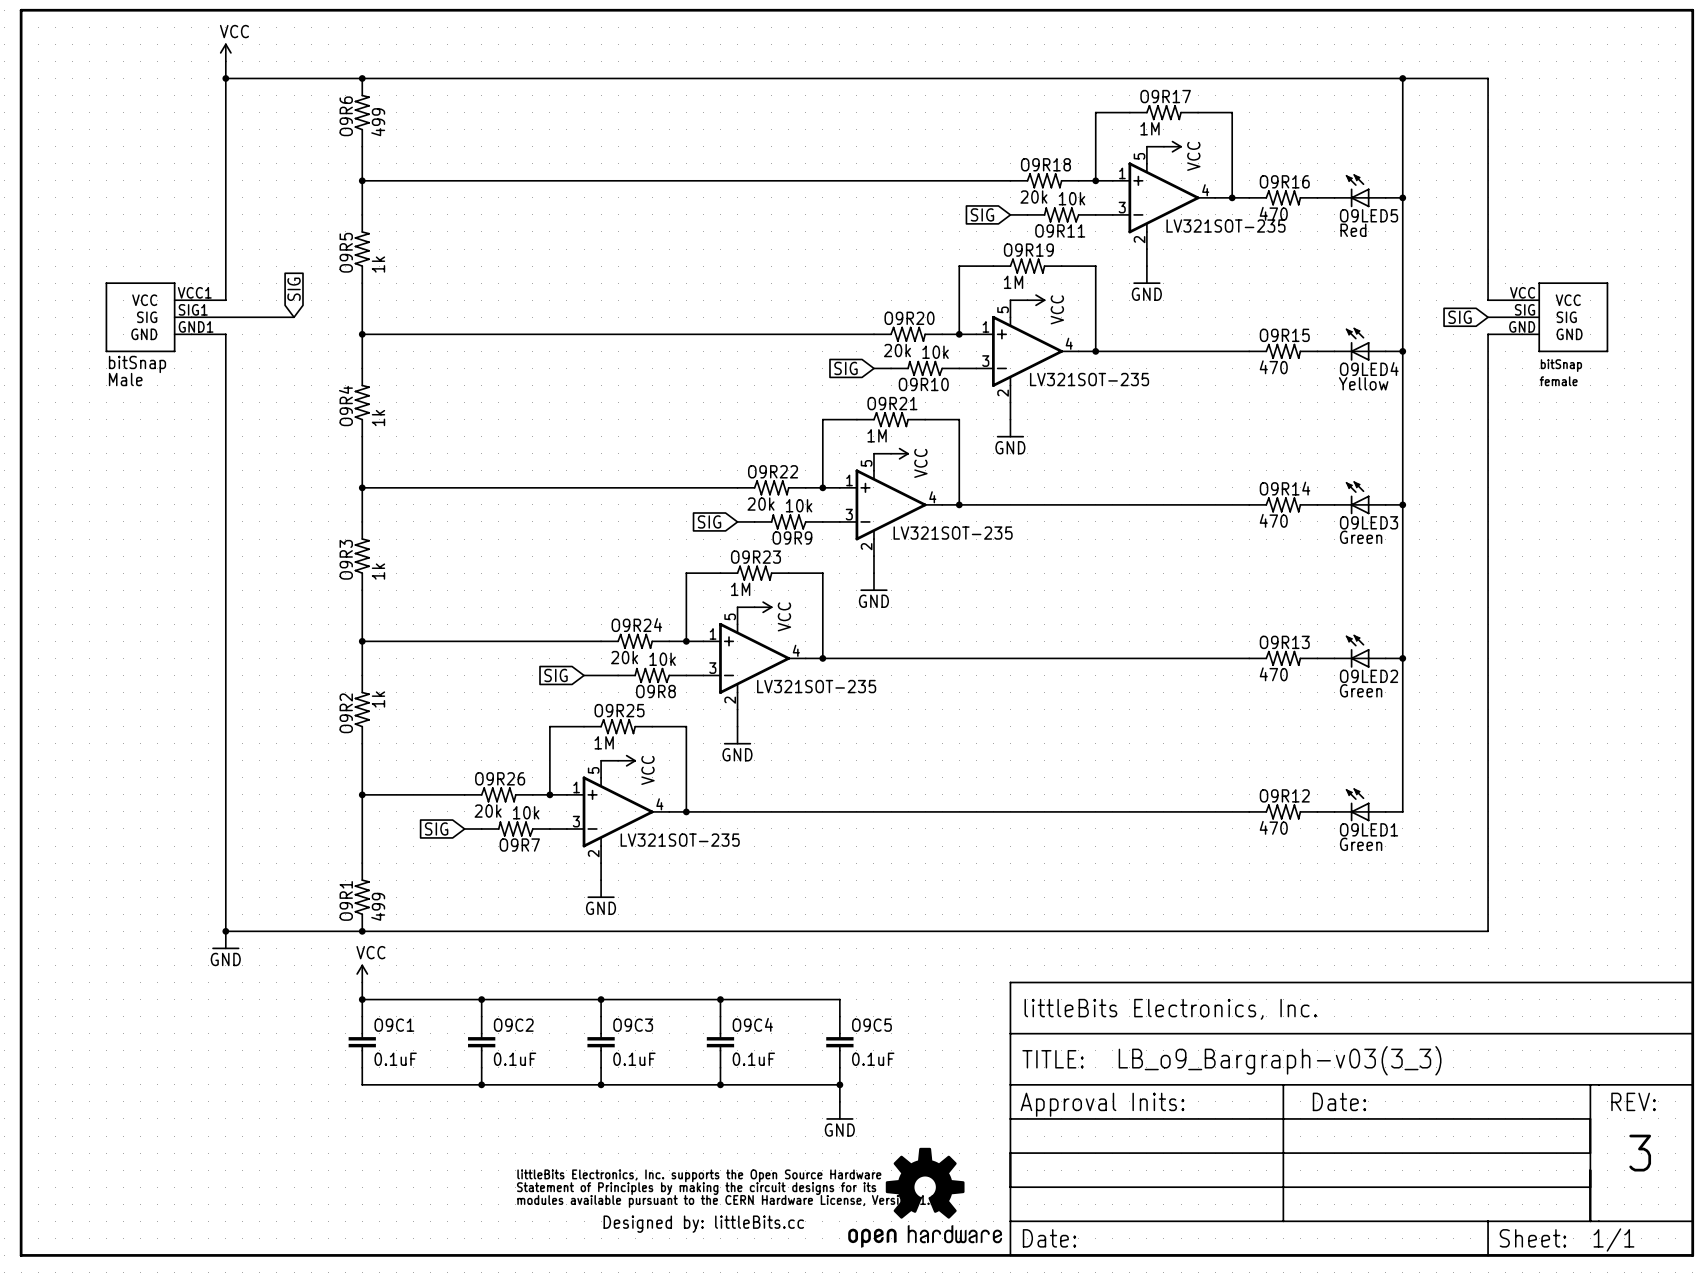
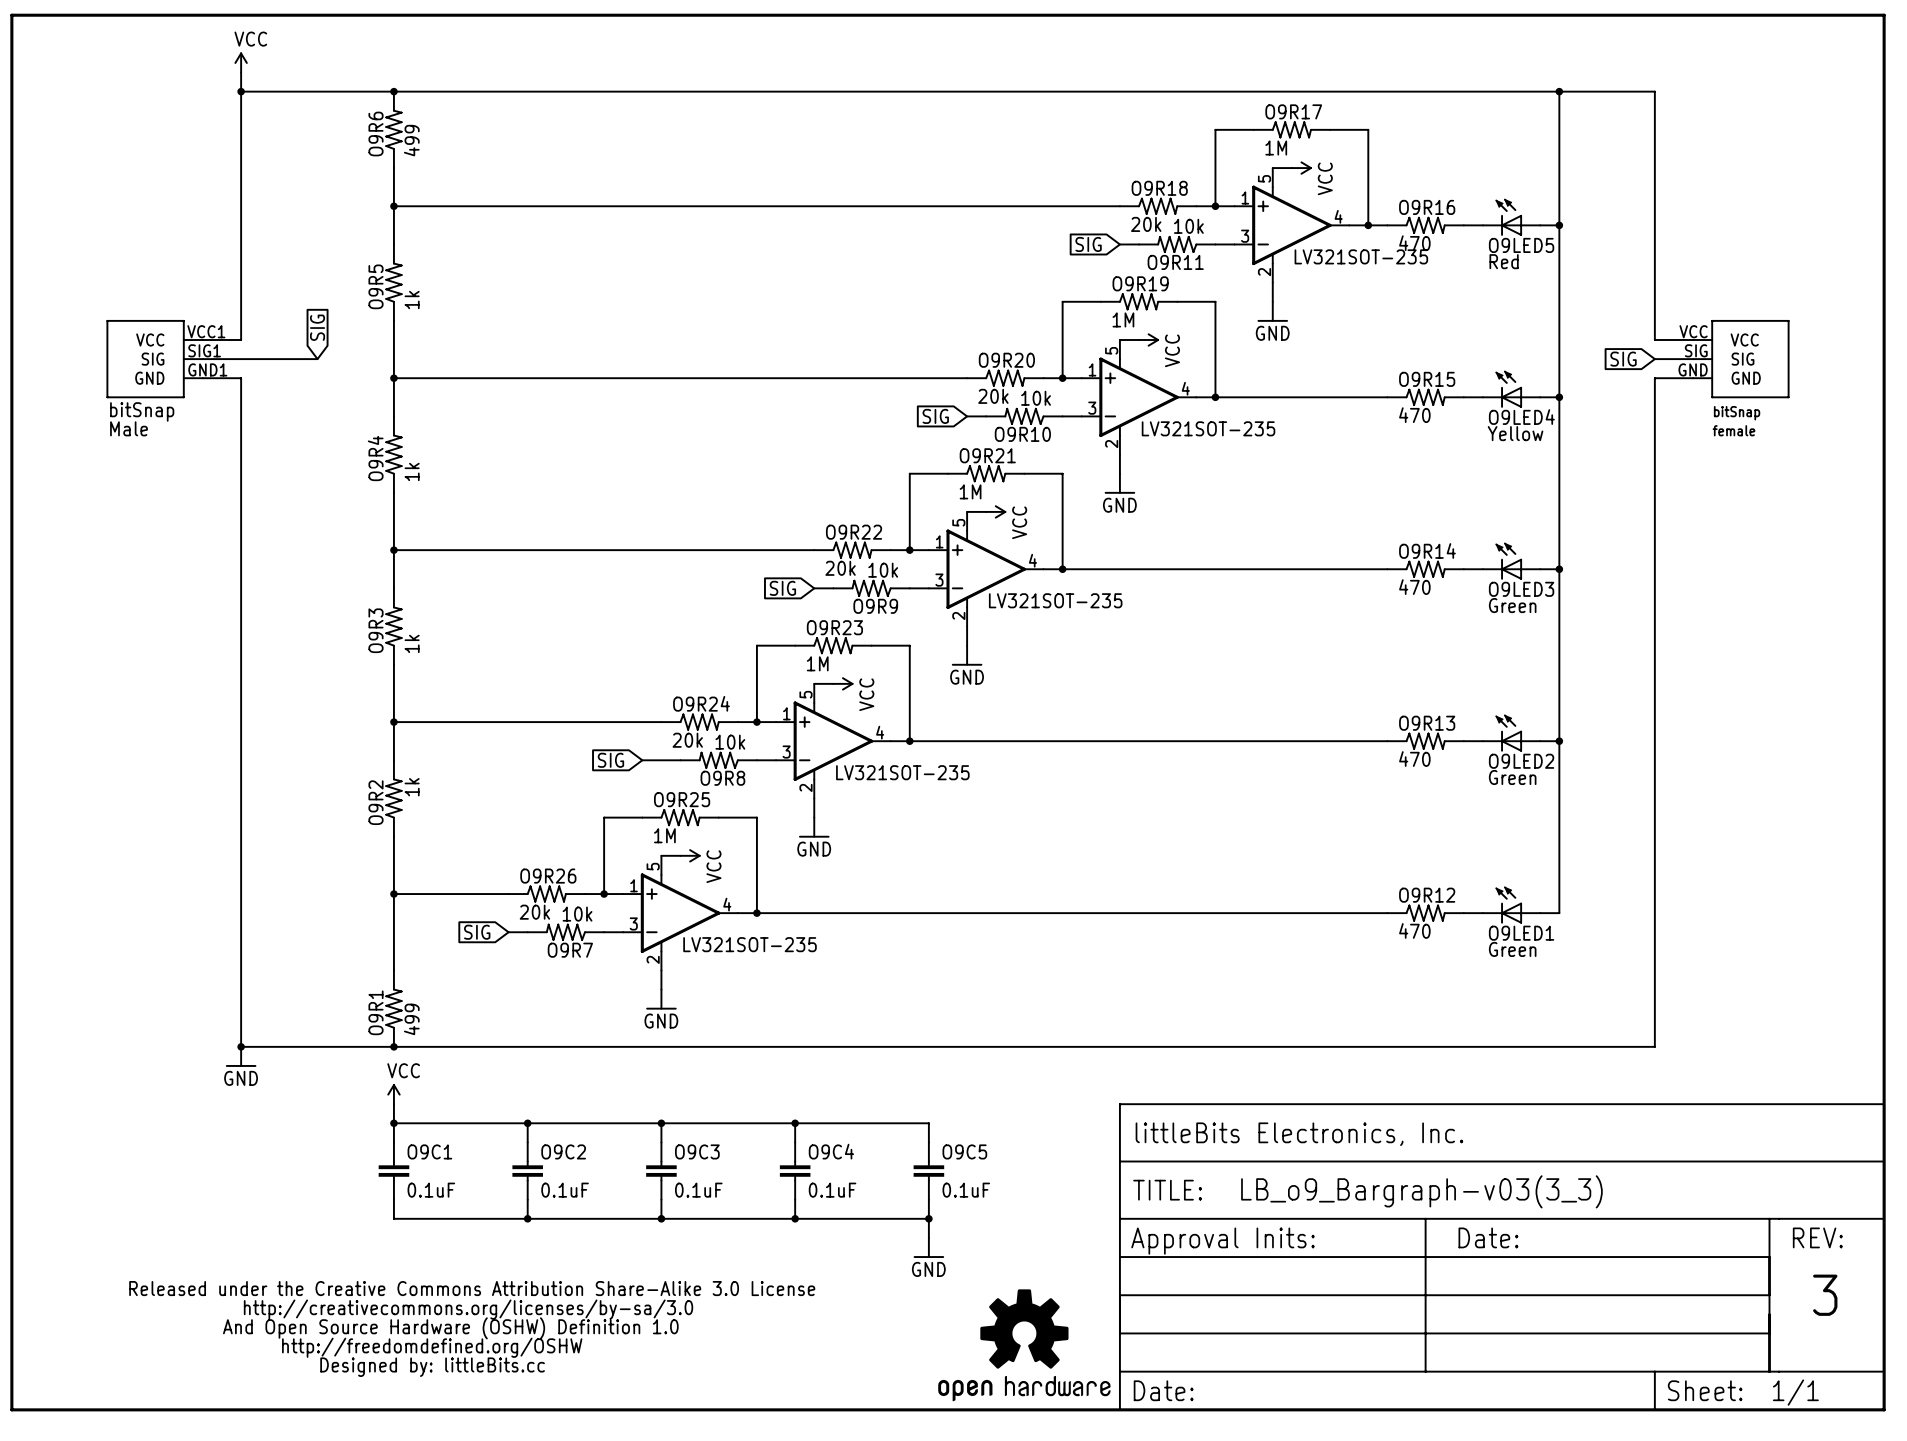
part: none -> (472, 1328)
part: (726, 1201) -> none

